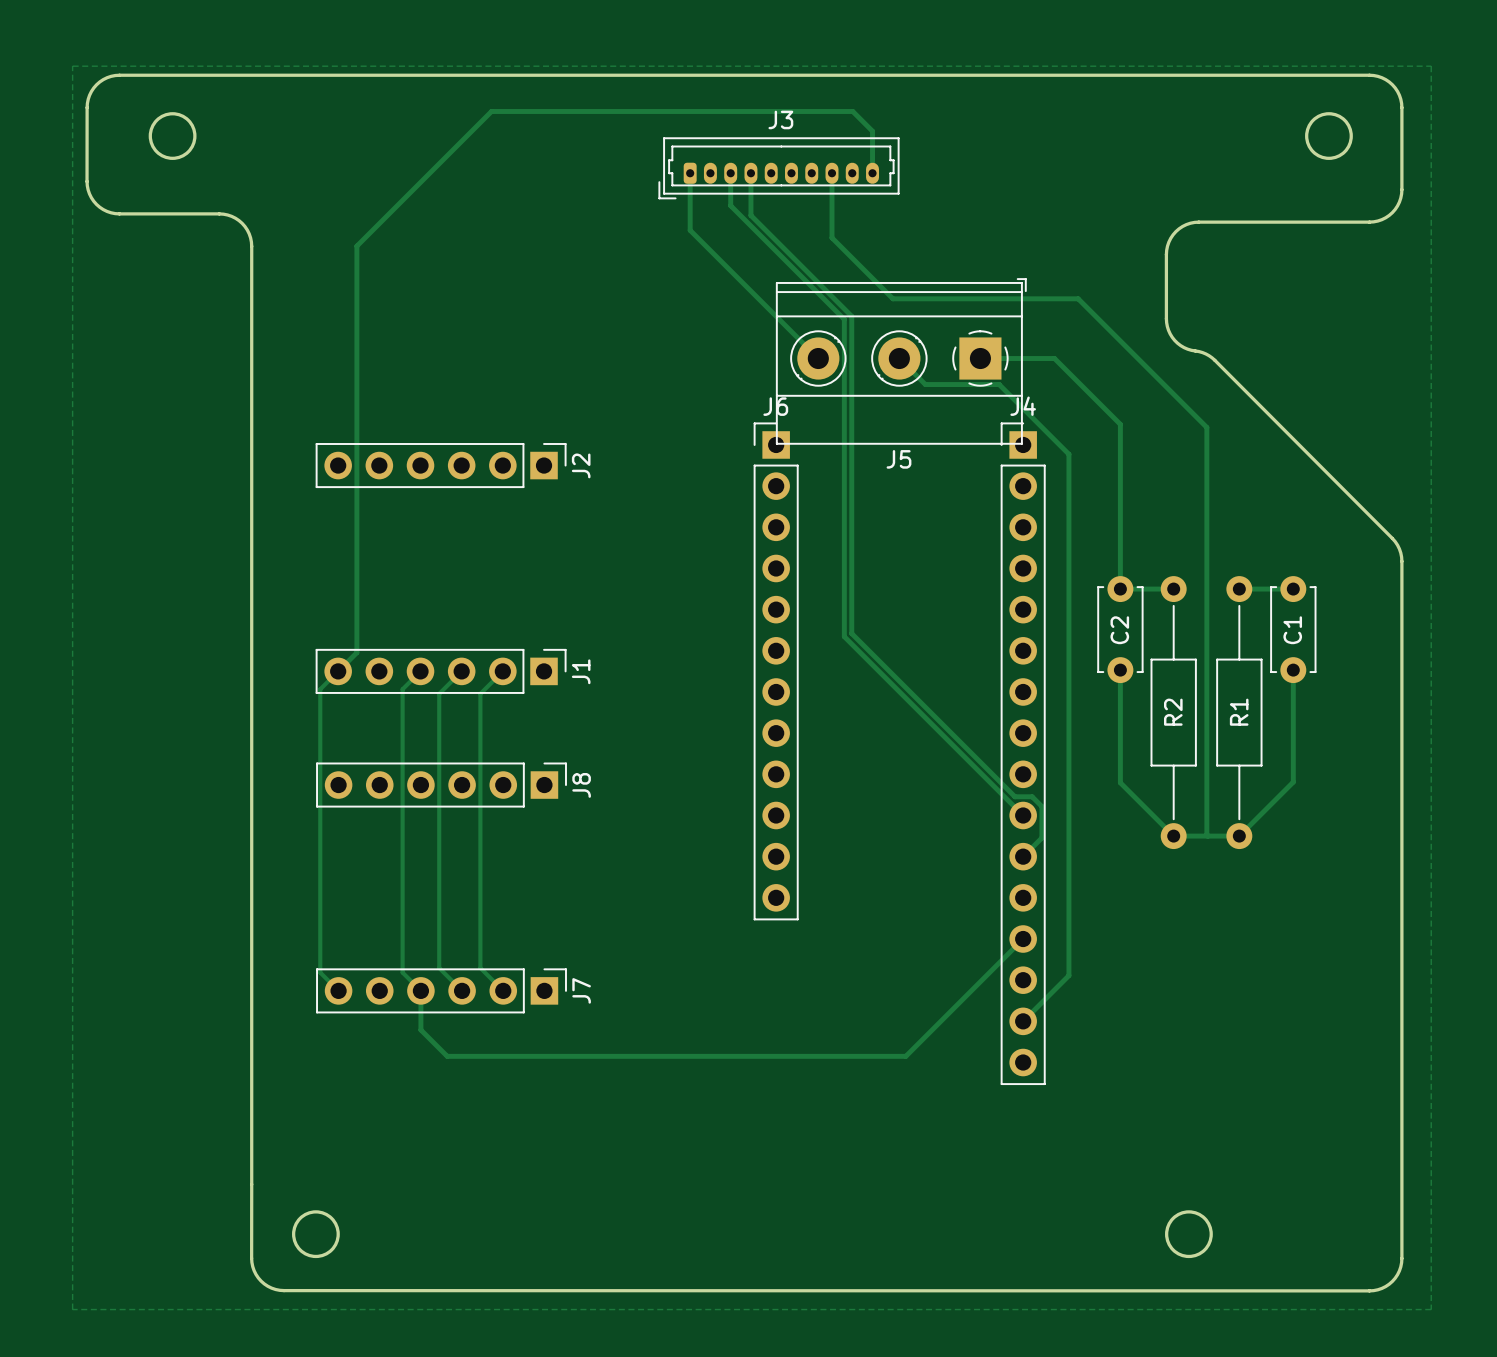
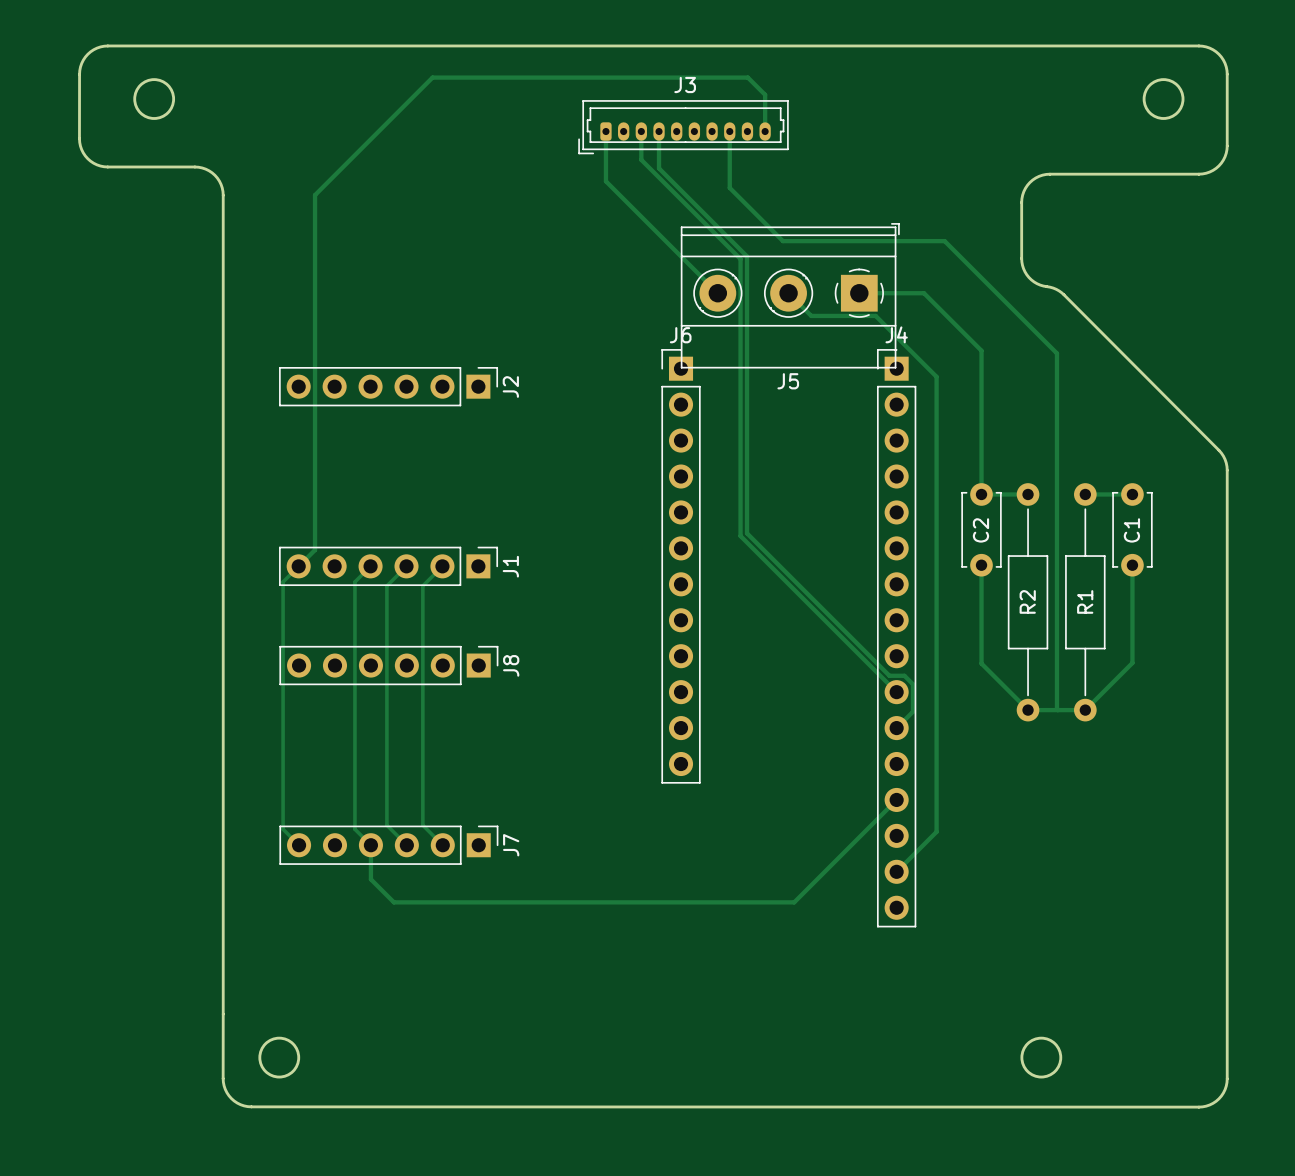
zone outline: (72, 66) (72, 1309) (1431, 1309) (1431, 66) (72, 66) -> none

